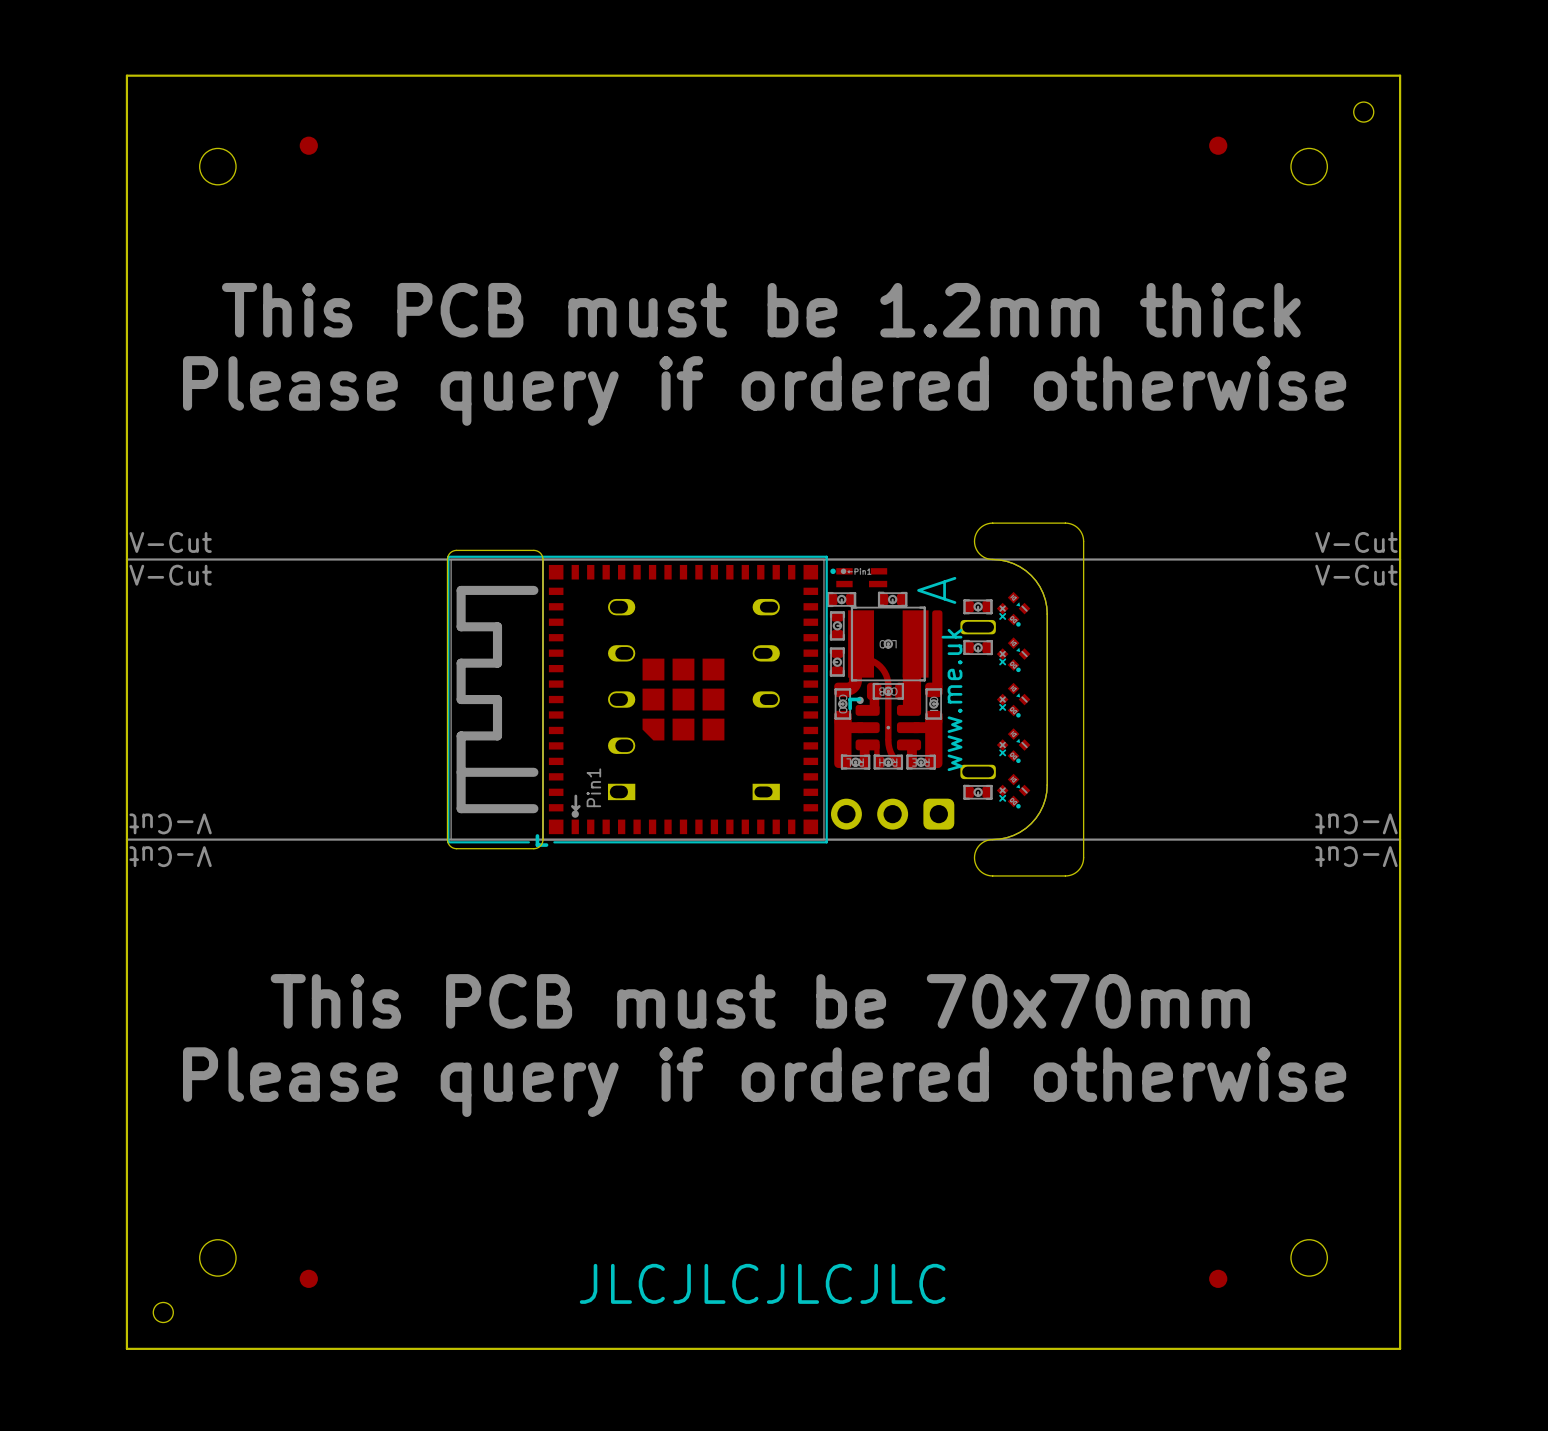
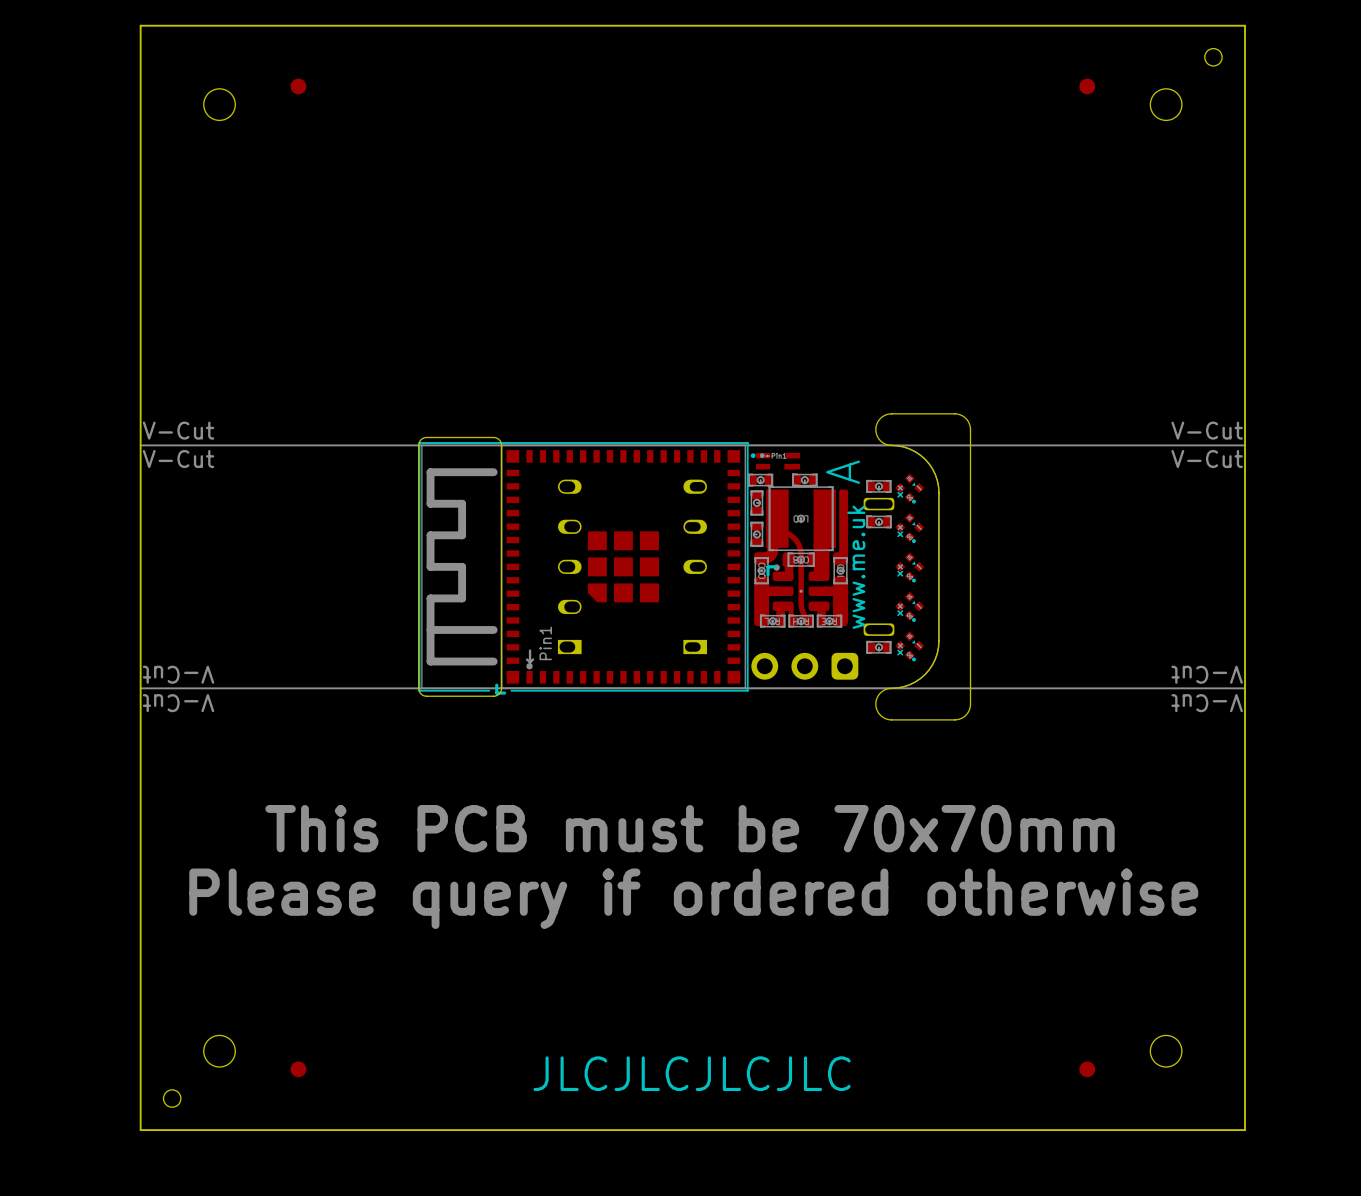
text: This PCB must be 1.2mm thick (761, 310) -> none
text: Please query if ordered otherwise (764, 390) -> none

